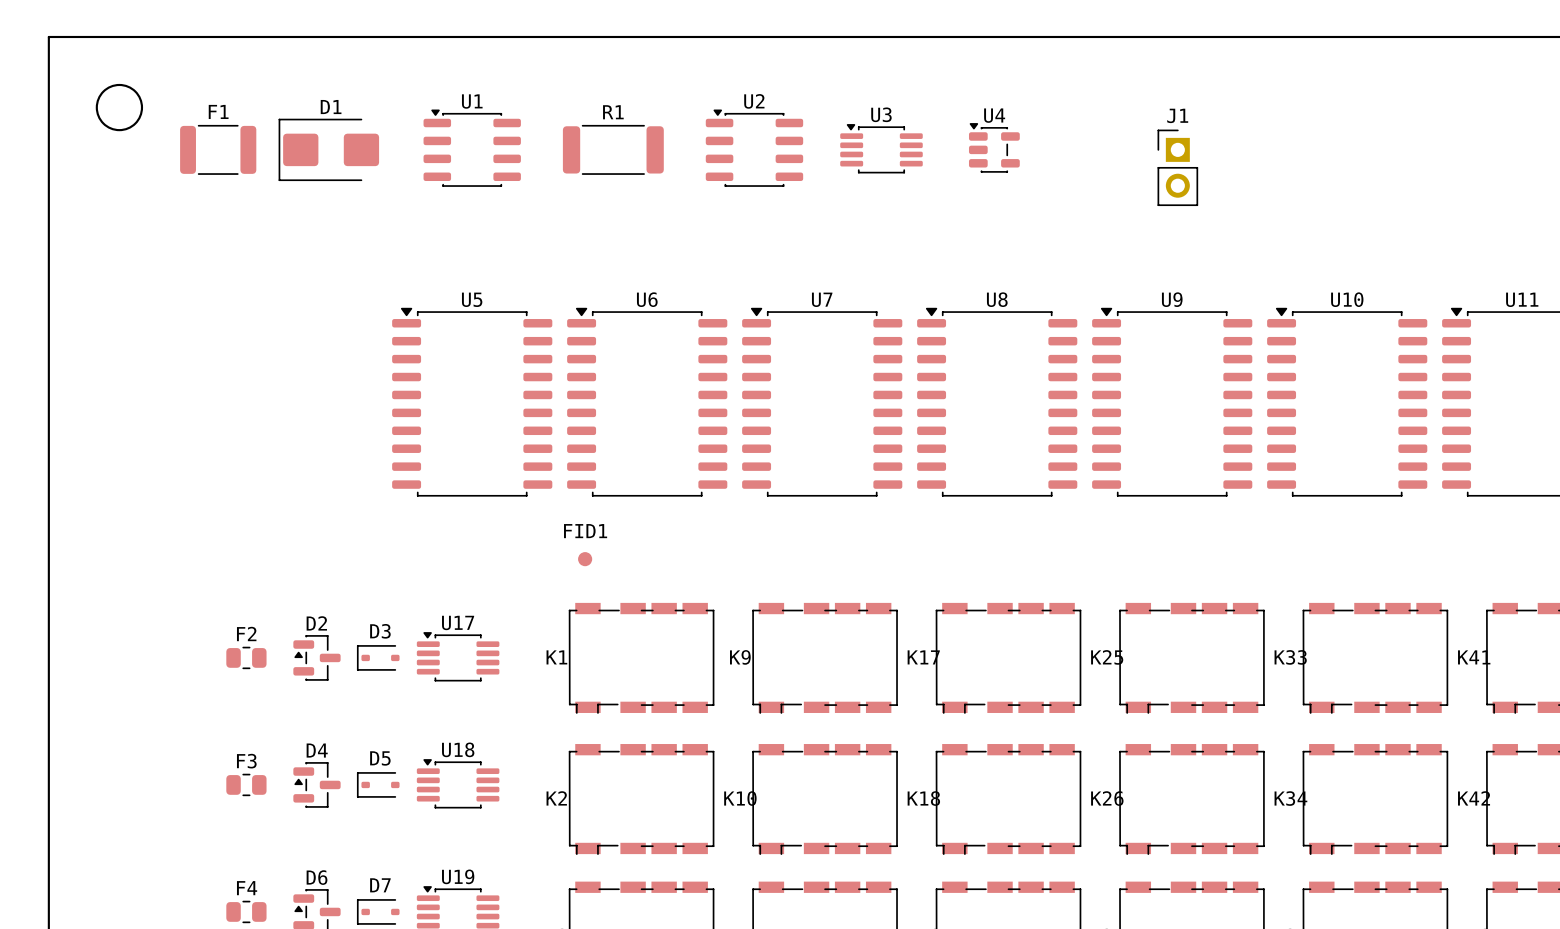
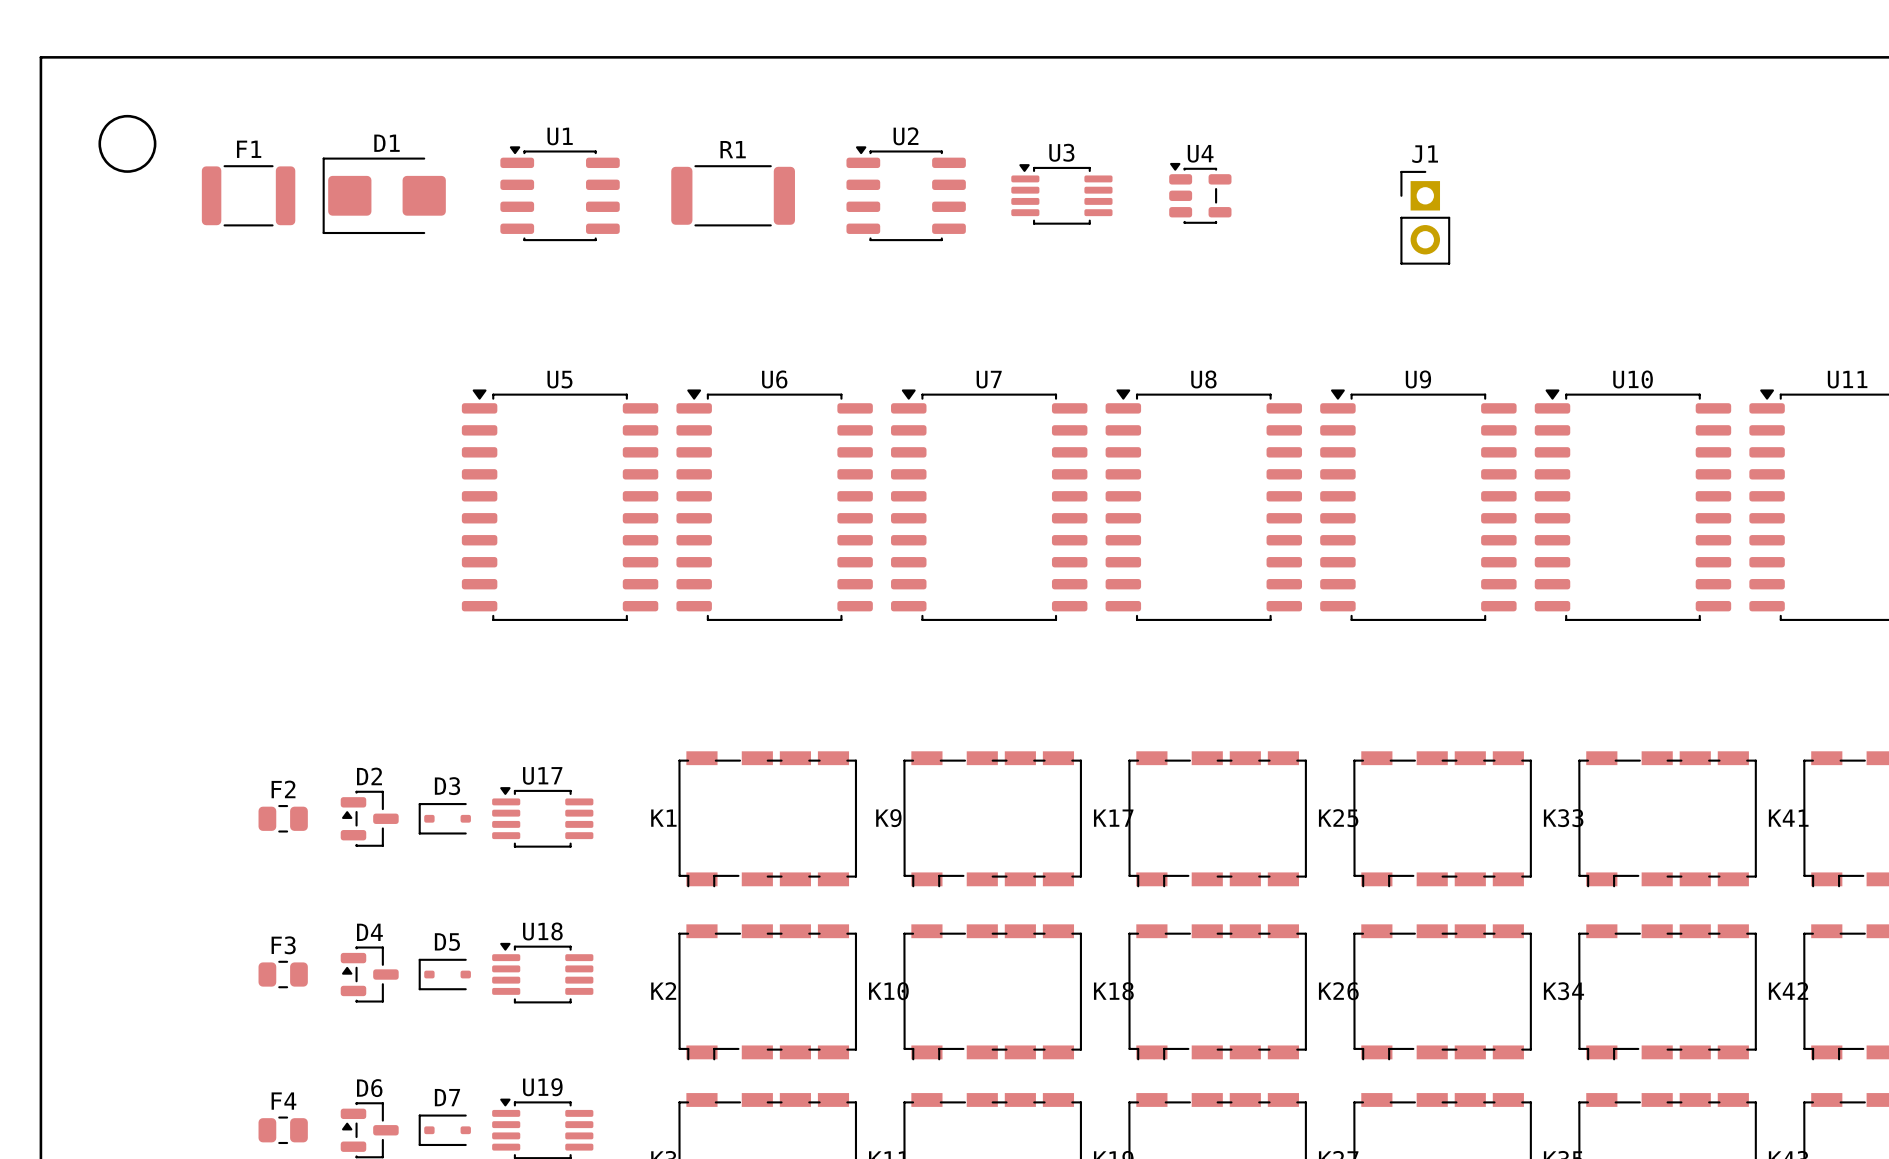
FID1: (585, 559) -> none

